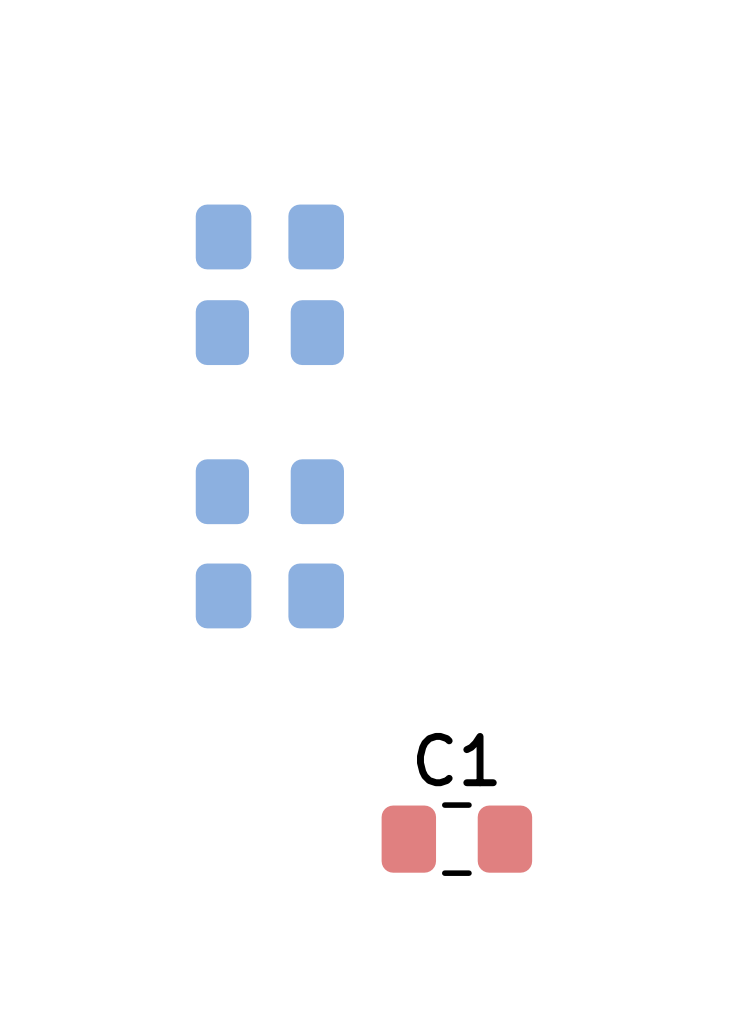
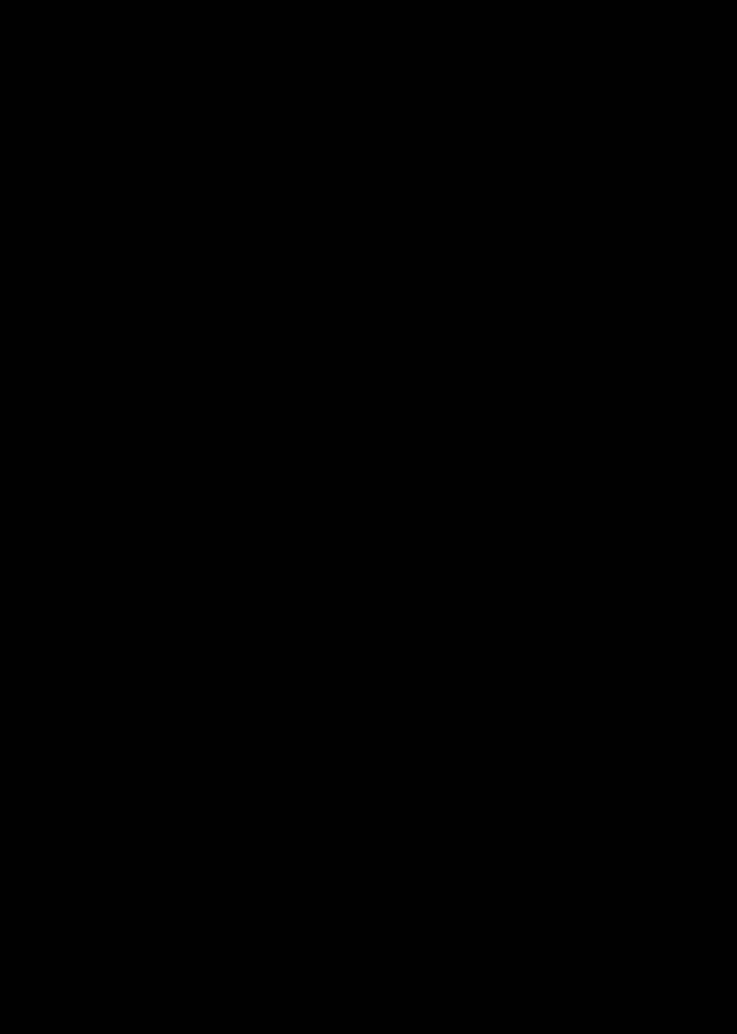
part: (269, 236) -> none
part: (269, 332) -> none
part: (269, 491) -> none
part: (269, 595) -> none
C1: (456, 839) -> none

